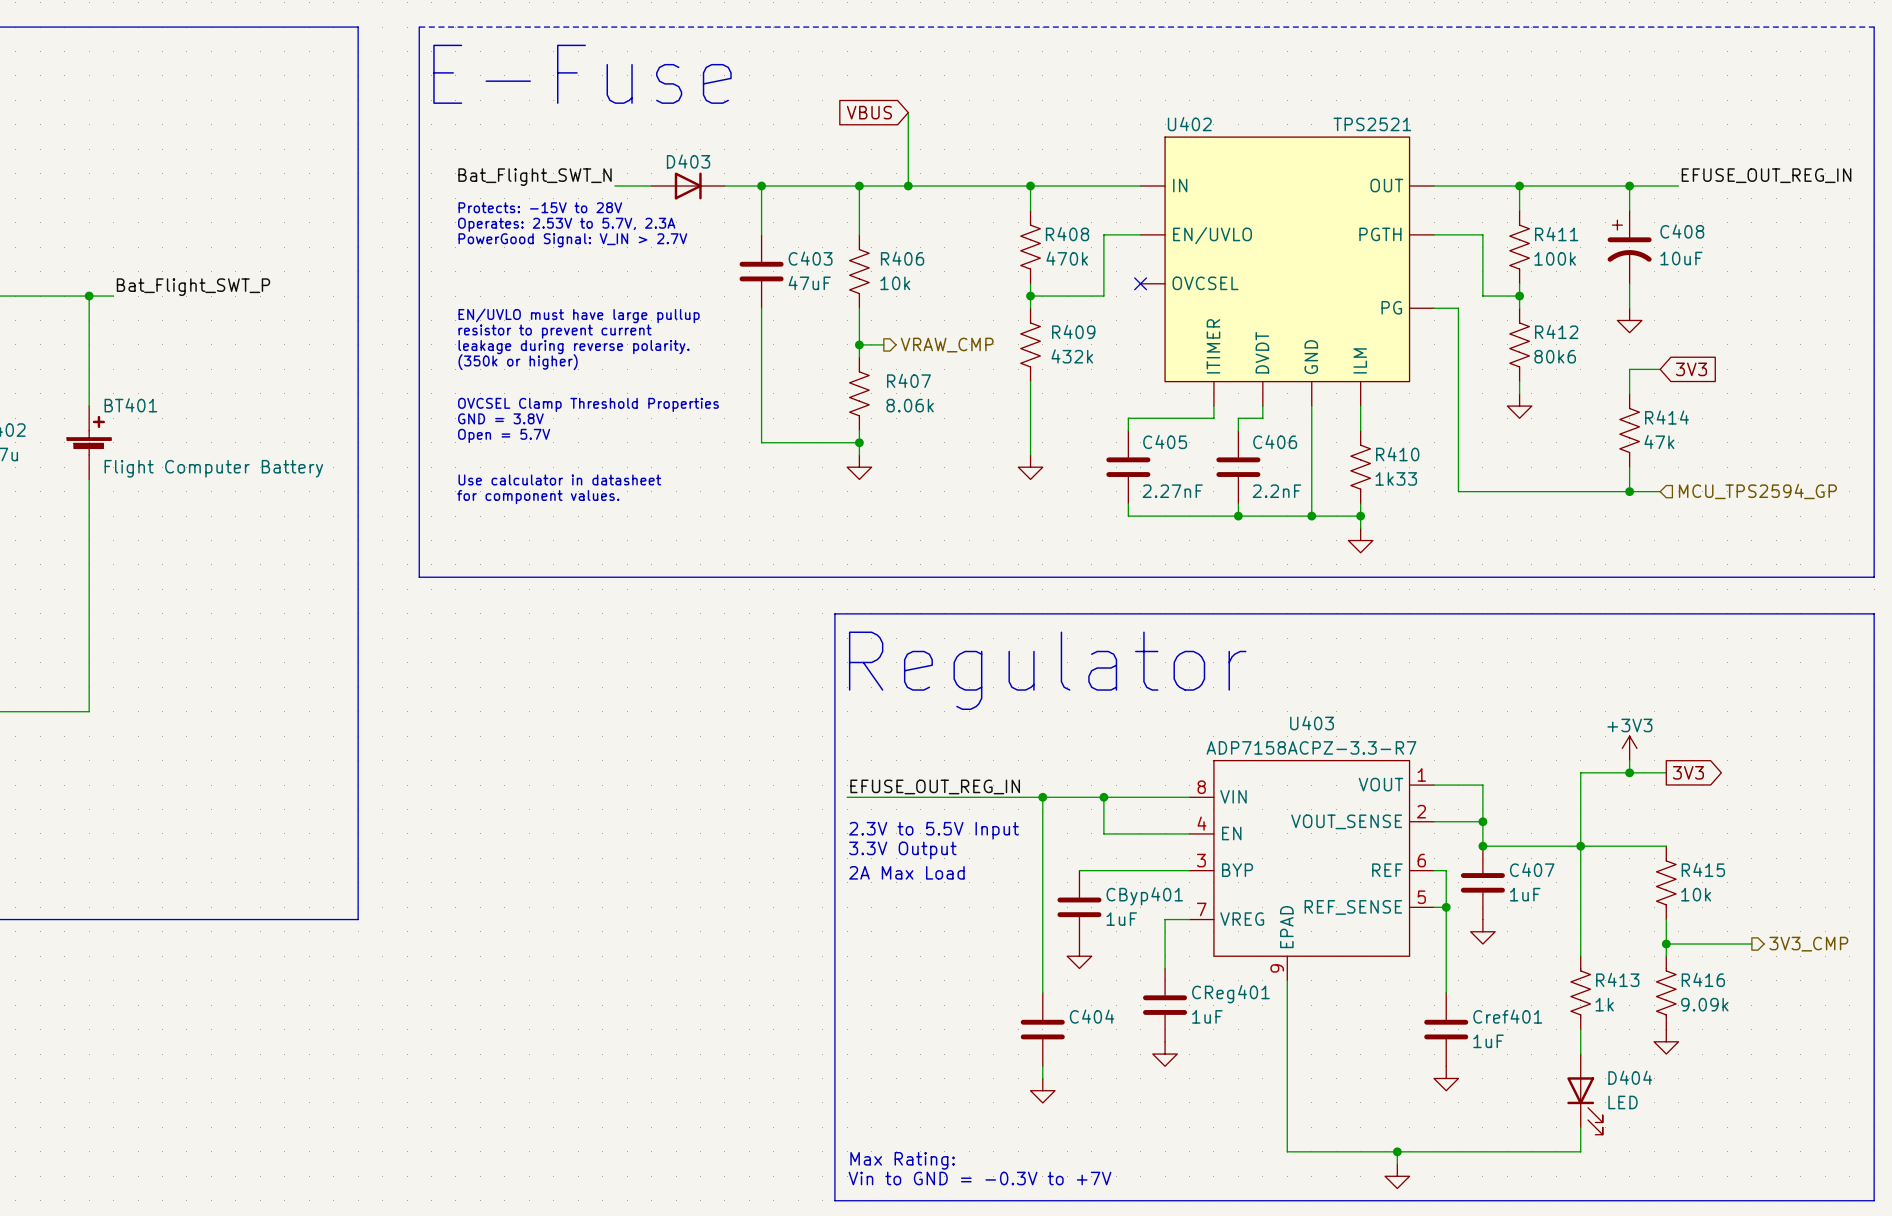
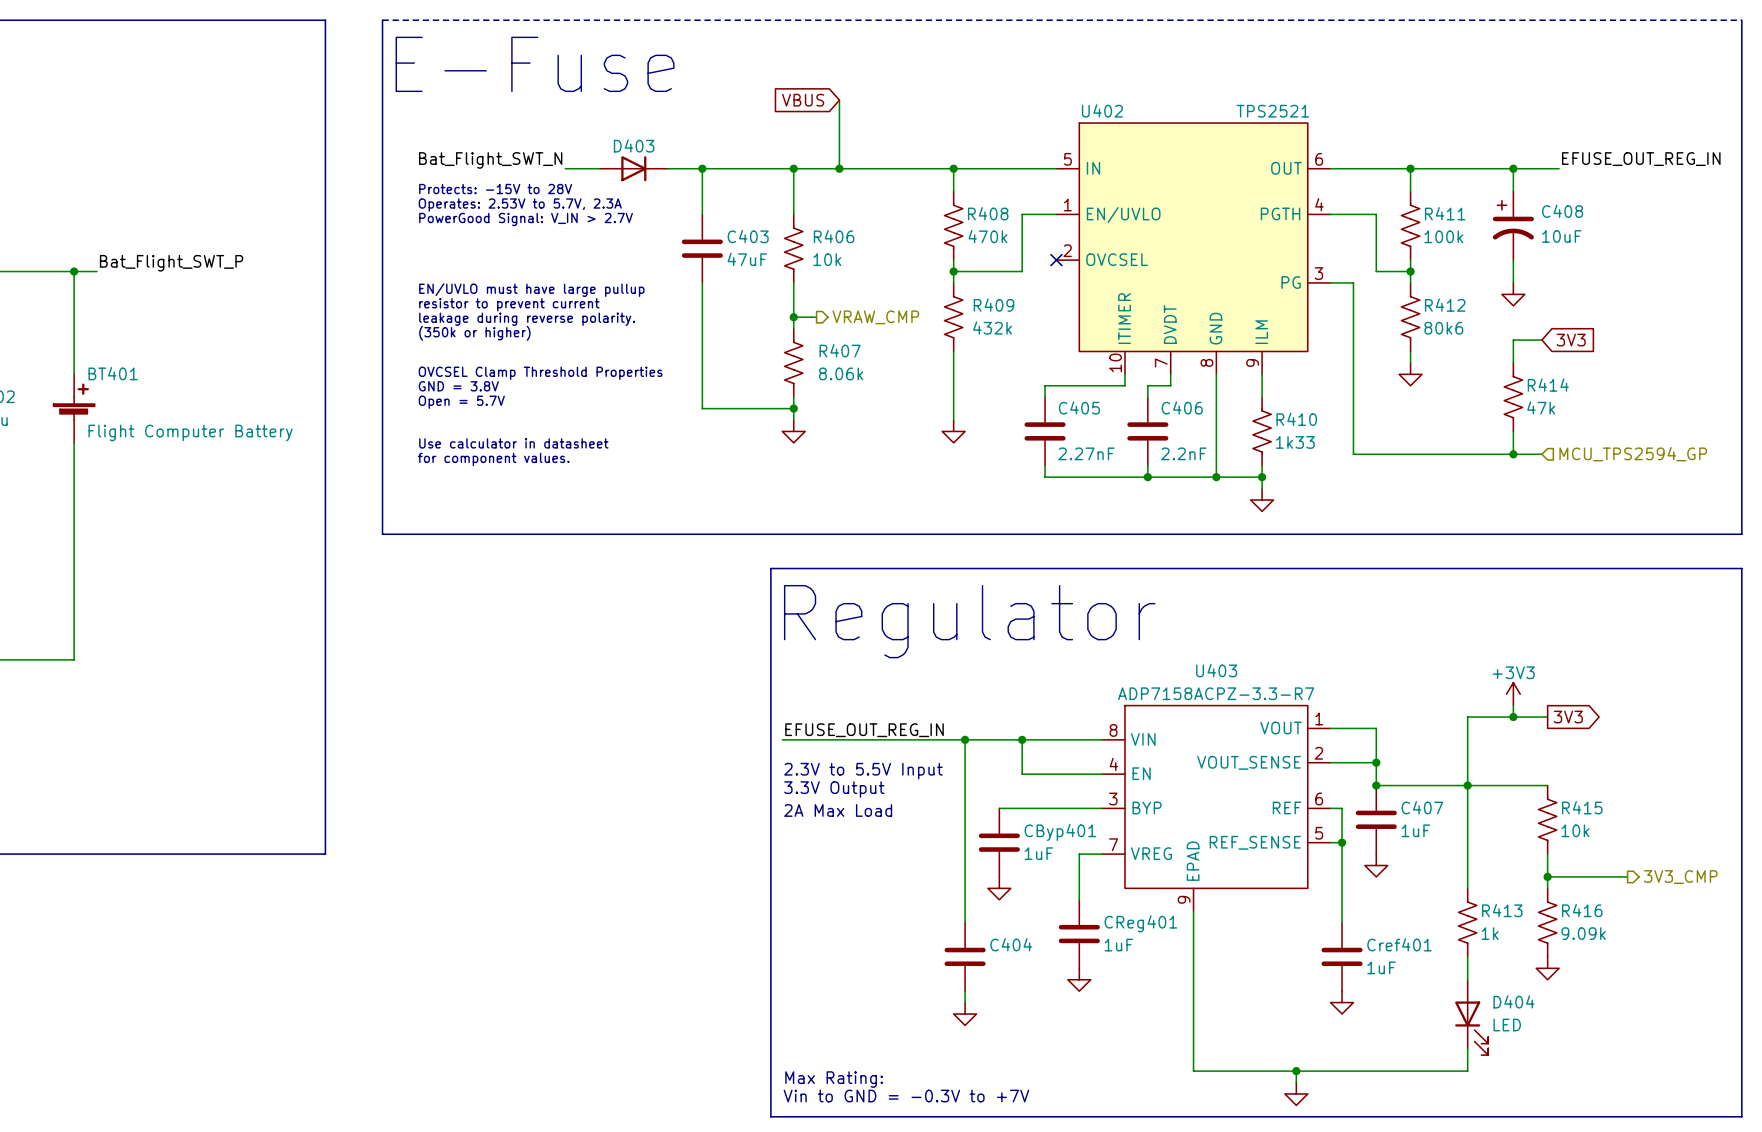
U402 symbol: [1140, 137, 1435, 407] -> [1056, 123, 1331, 375]

